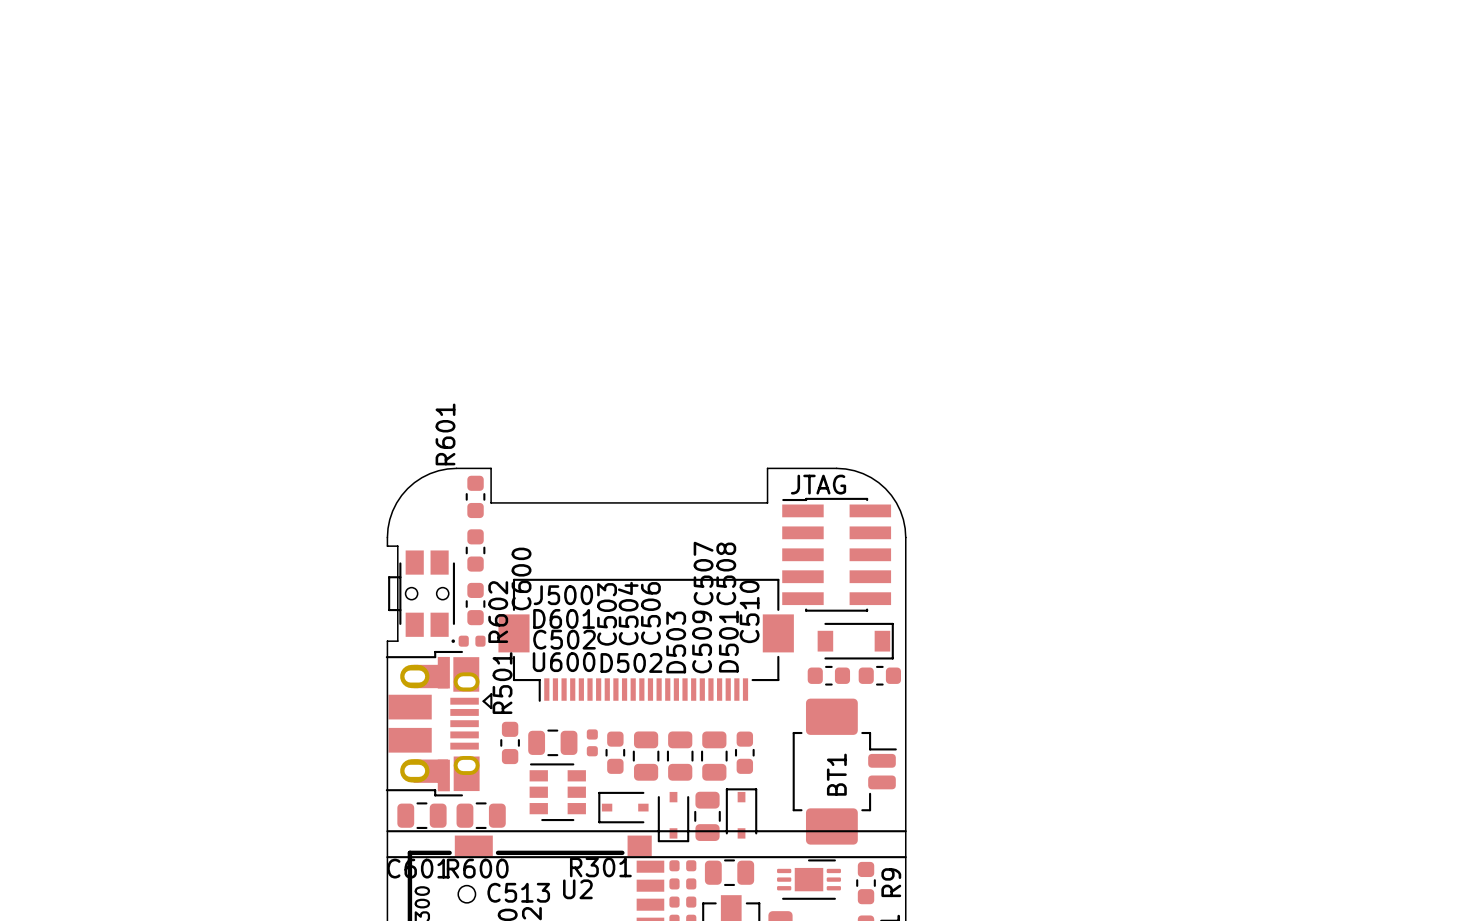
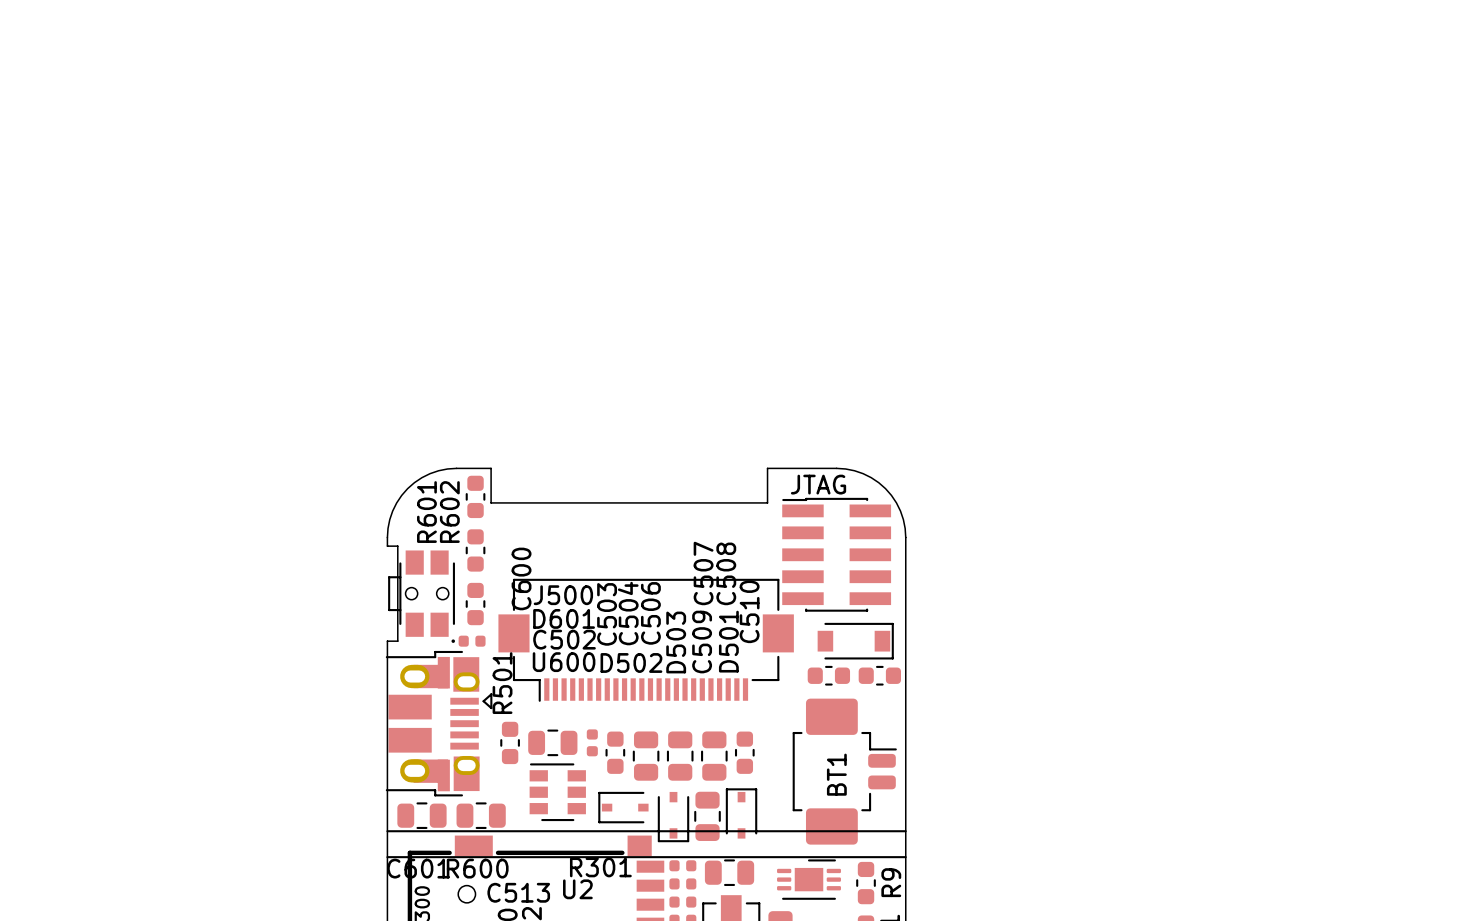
R601 name position: R601 (445, 434) -> R601 (426, 512)
R602 name position: R602 (498, 612) -> R602 (449, 512)

